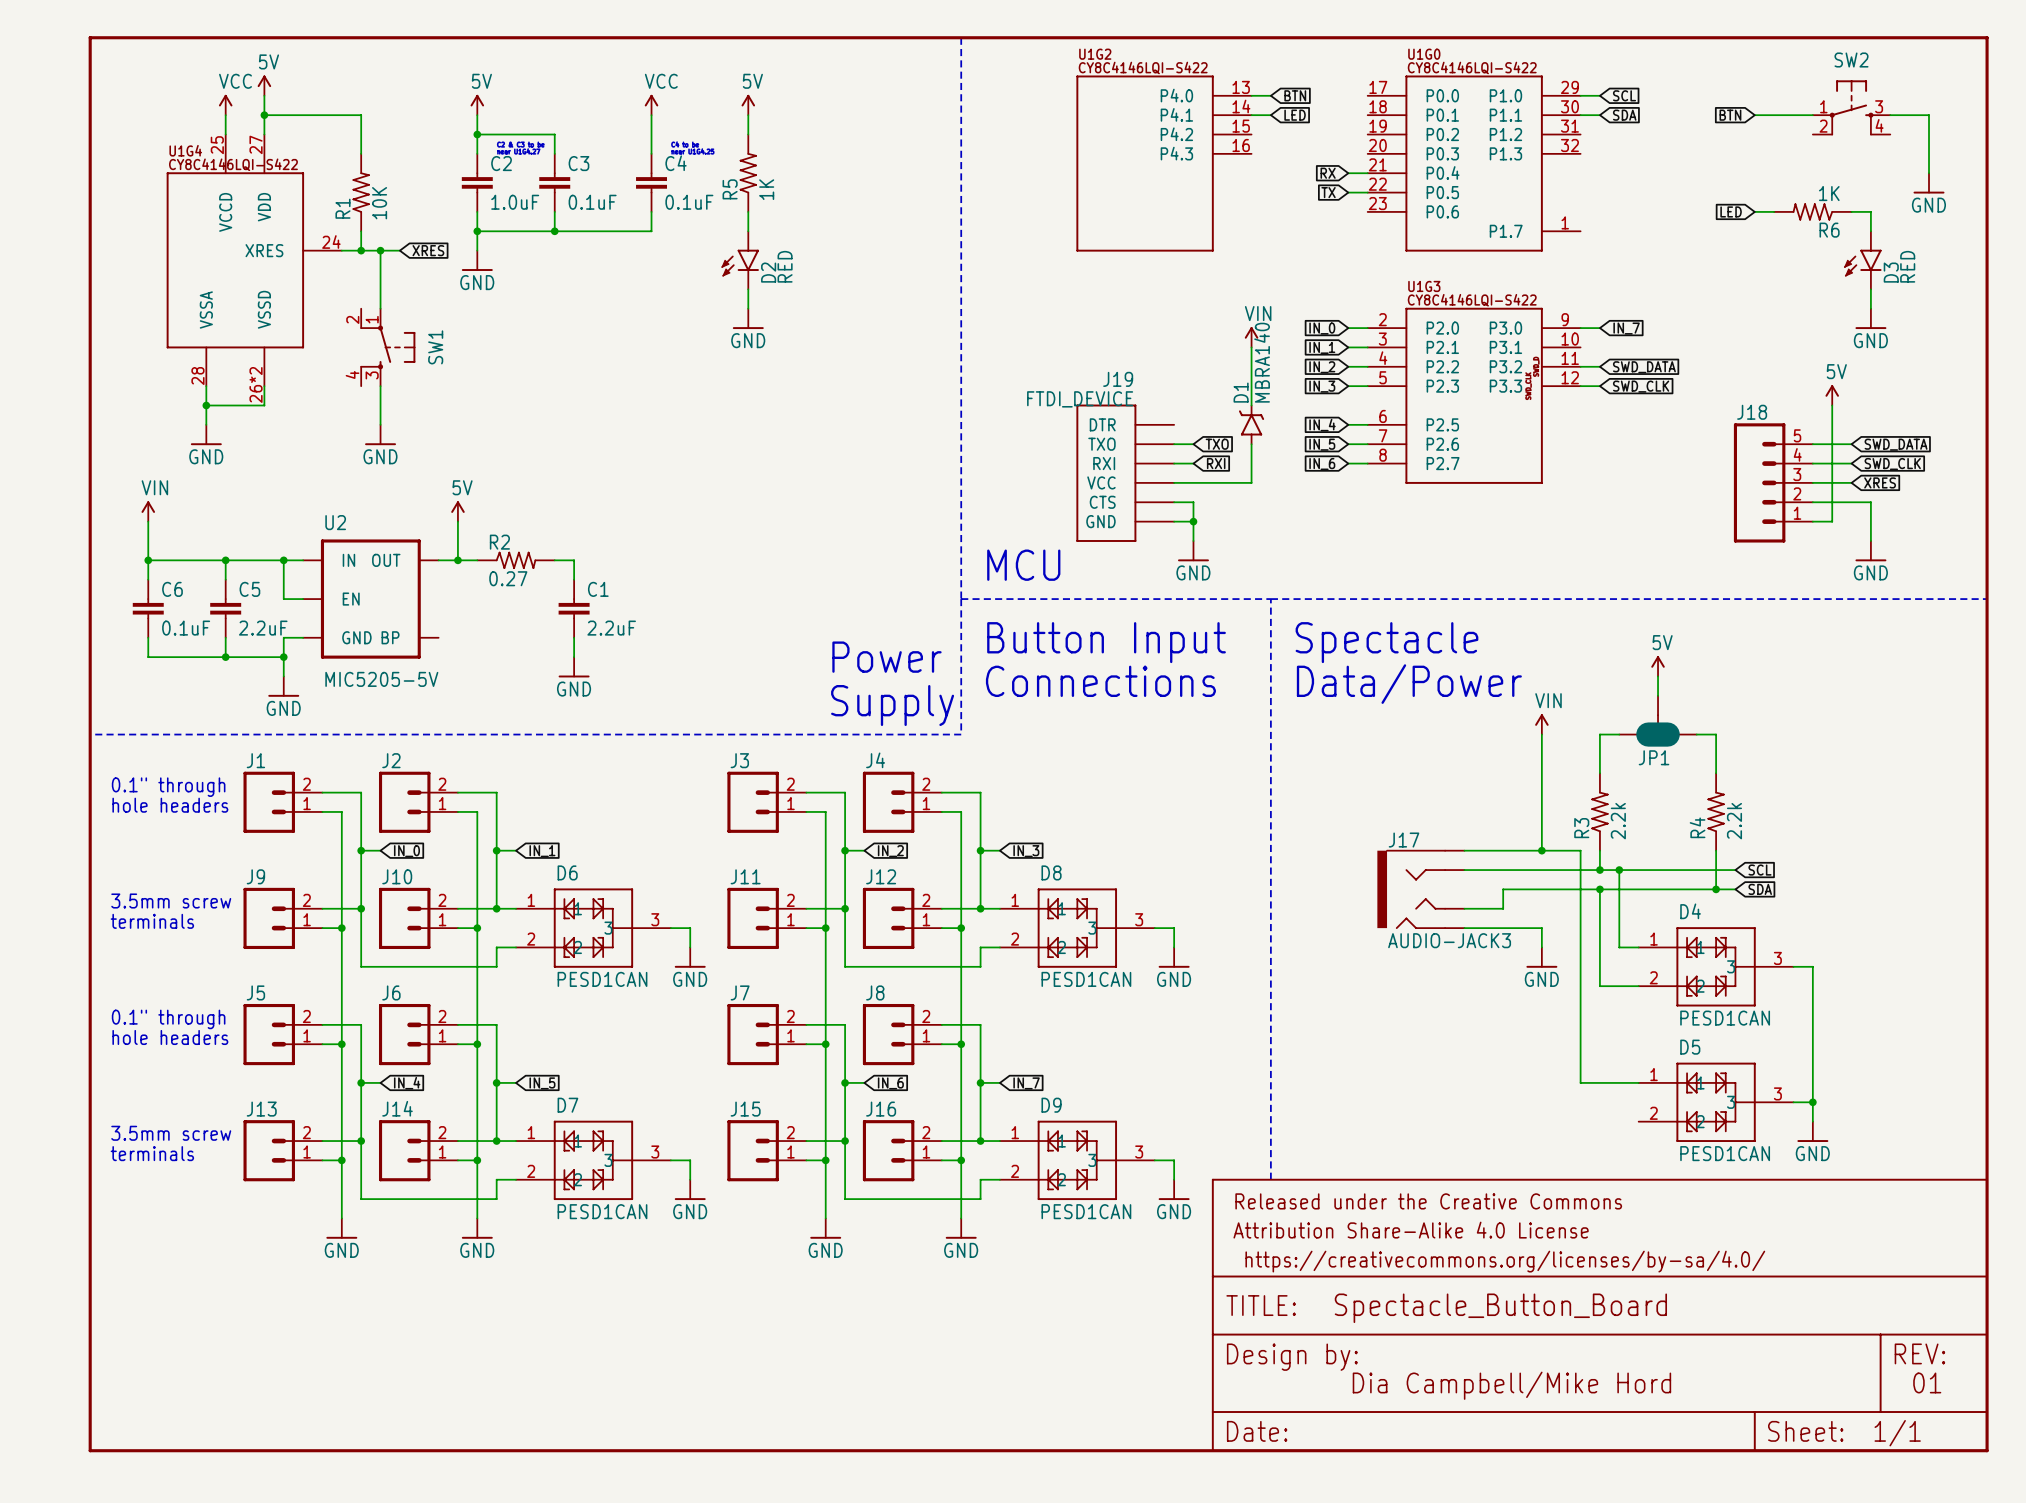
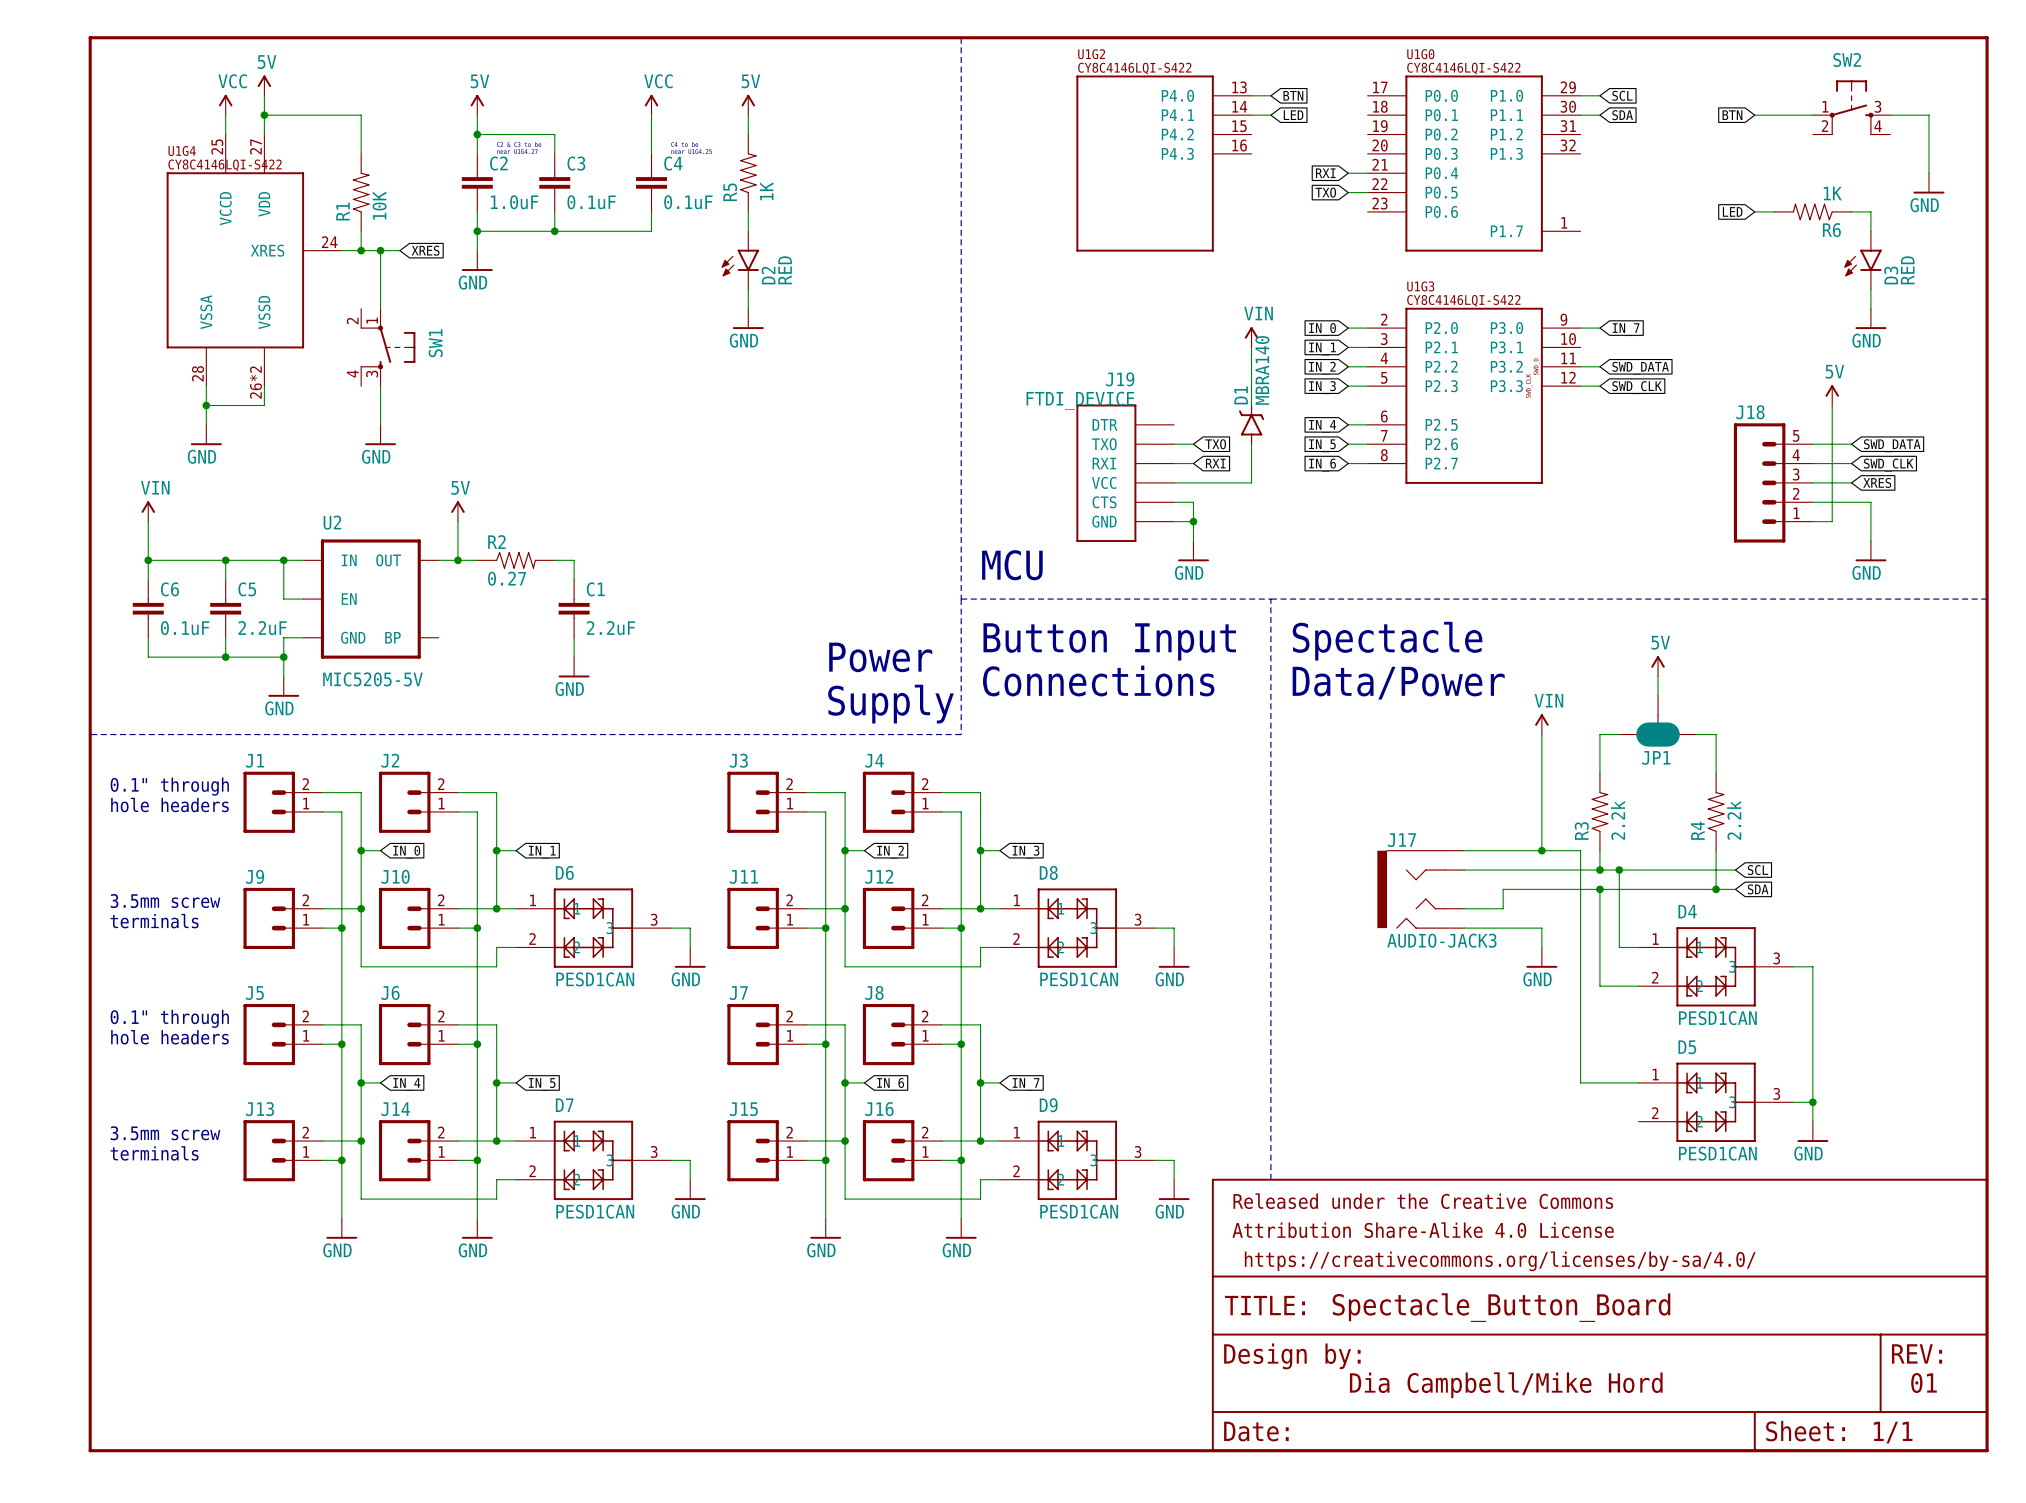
global label: RX (1328, 173) -> RXI (1325, 173)
global label: TX (1328, 192) -> TXO (1325, 192)

